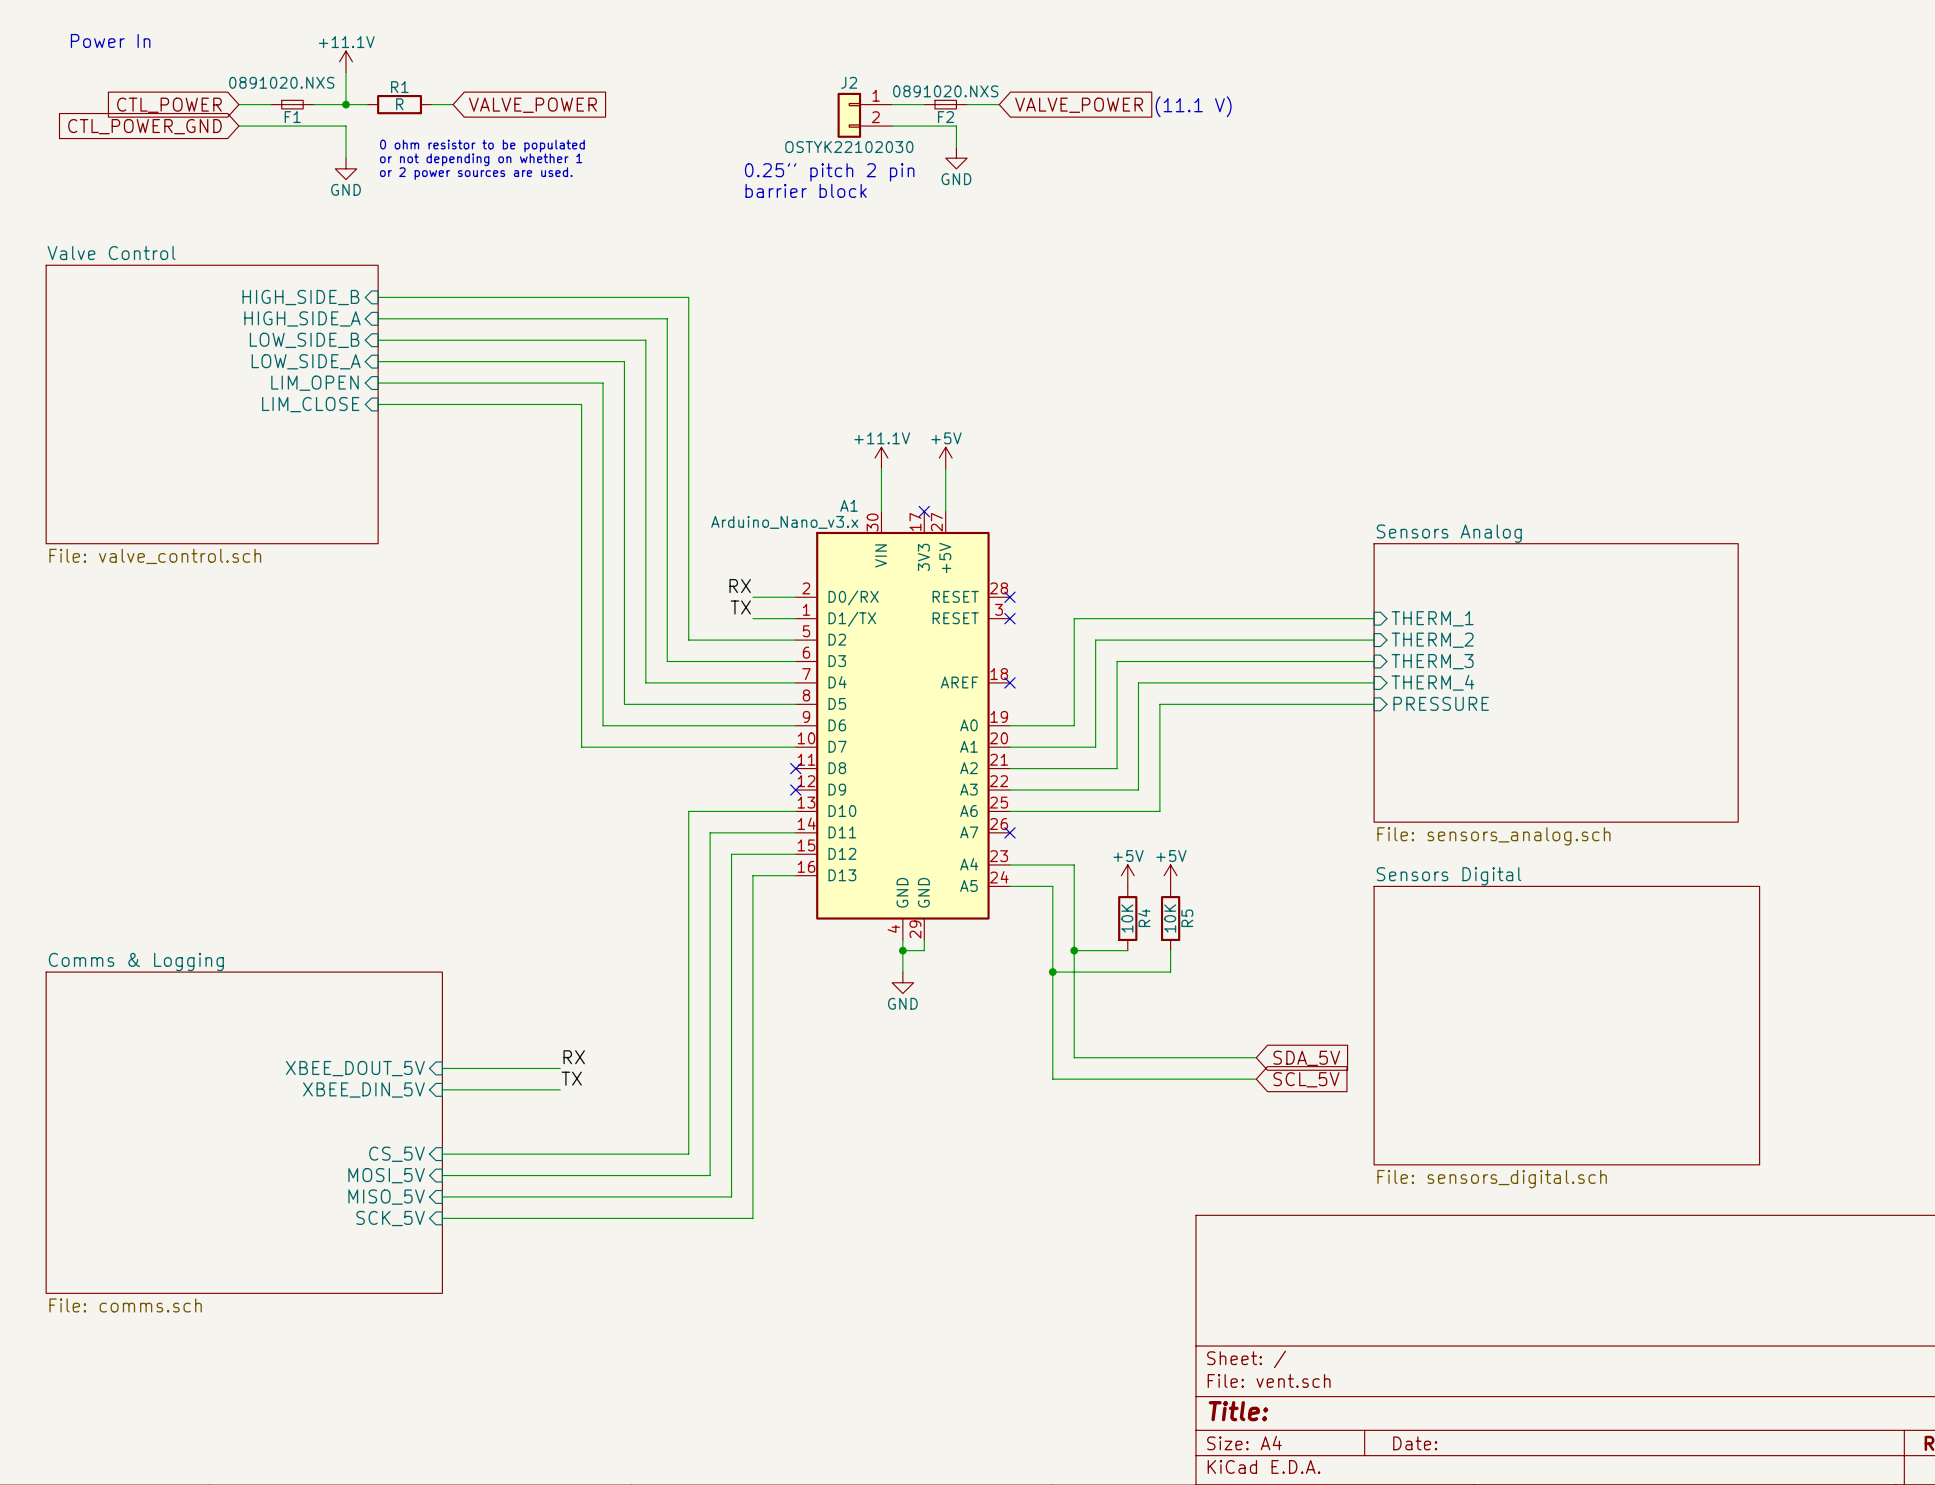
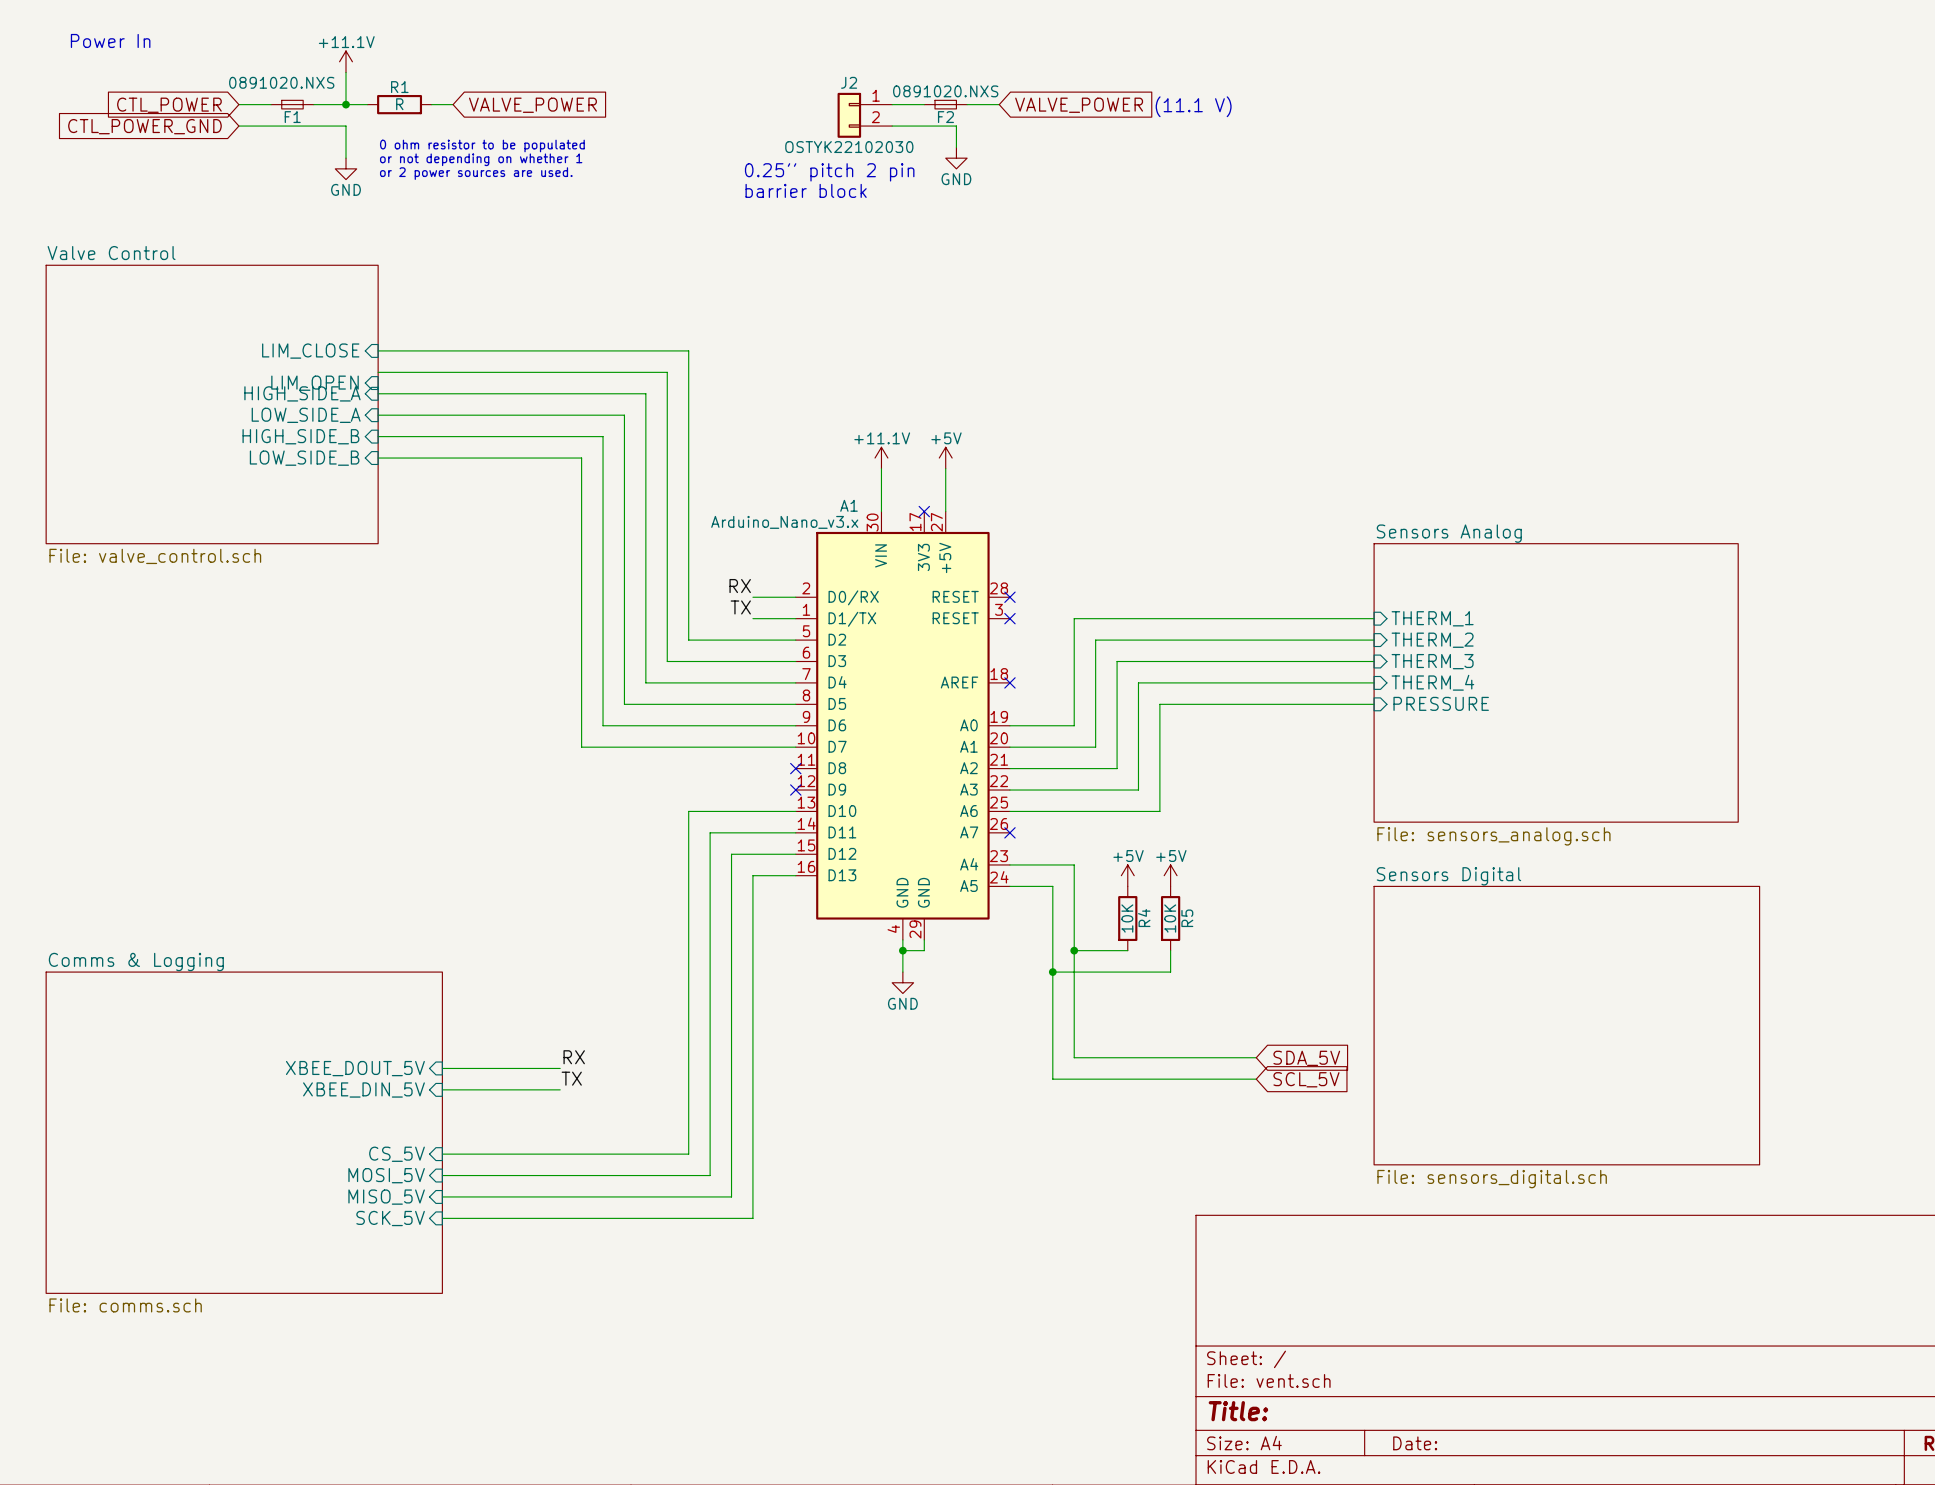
sheet pin position: HIGH_SIDE_B (300, 297) -> HIGH_SIDE_B (300, 436)
wire: (378, 297) (688, 297) (688, 350) -> (378, 350) (688, 350)
sheet pin position: HIGH_SIDE_A (302, 318) -> HIGH_SIDE_A (302, 393)
wire: (378, 318) (667, 318) (667, 372) -> (378, 372) (667, 372)
sheet pin position: LOW_SIDE_B (304, 340) -> LOW_SIDE_B (304, 458)
wire: (378, 340) (645, 340) (645, 393) -> (378, 393) (645, 393)
sheet pin position: LOW_SIDE_A (306, 361) -> LOW_SIDE_A (306, 415)
wire: (378, 361) (624, 361) (624, 415) -> (378, 415) (624, 415)
wire: (378, 383) (603, 383) (603, 436) -> (378, 436) (603, 436)
sheet pin position: LIM_CLOSE (310, 404) -> LIM_CLOSE (310, 351)
wire: (378, 404) (581, 404) (581, 458) -> (378, 458) (581, 458)

